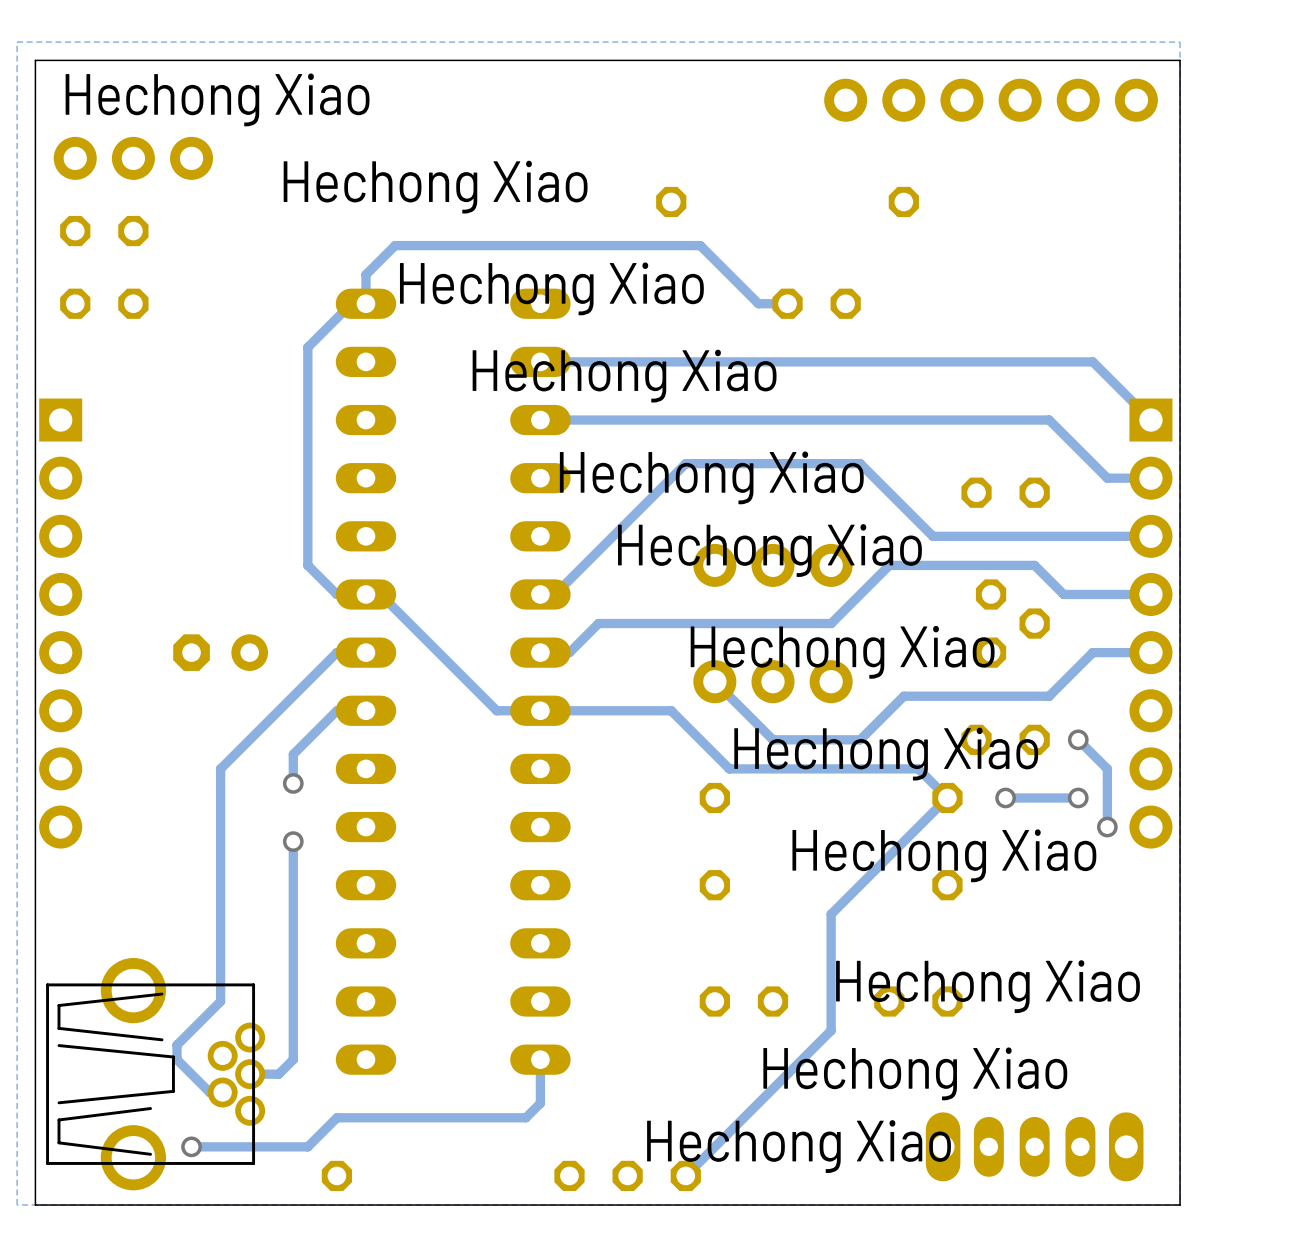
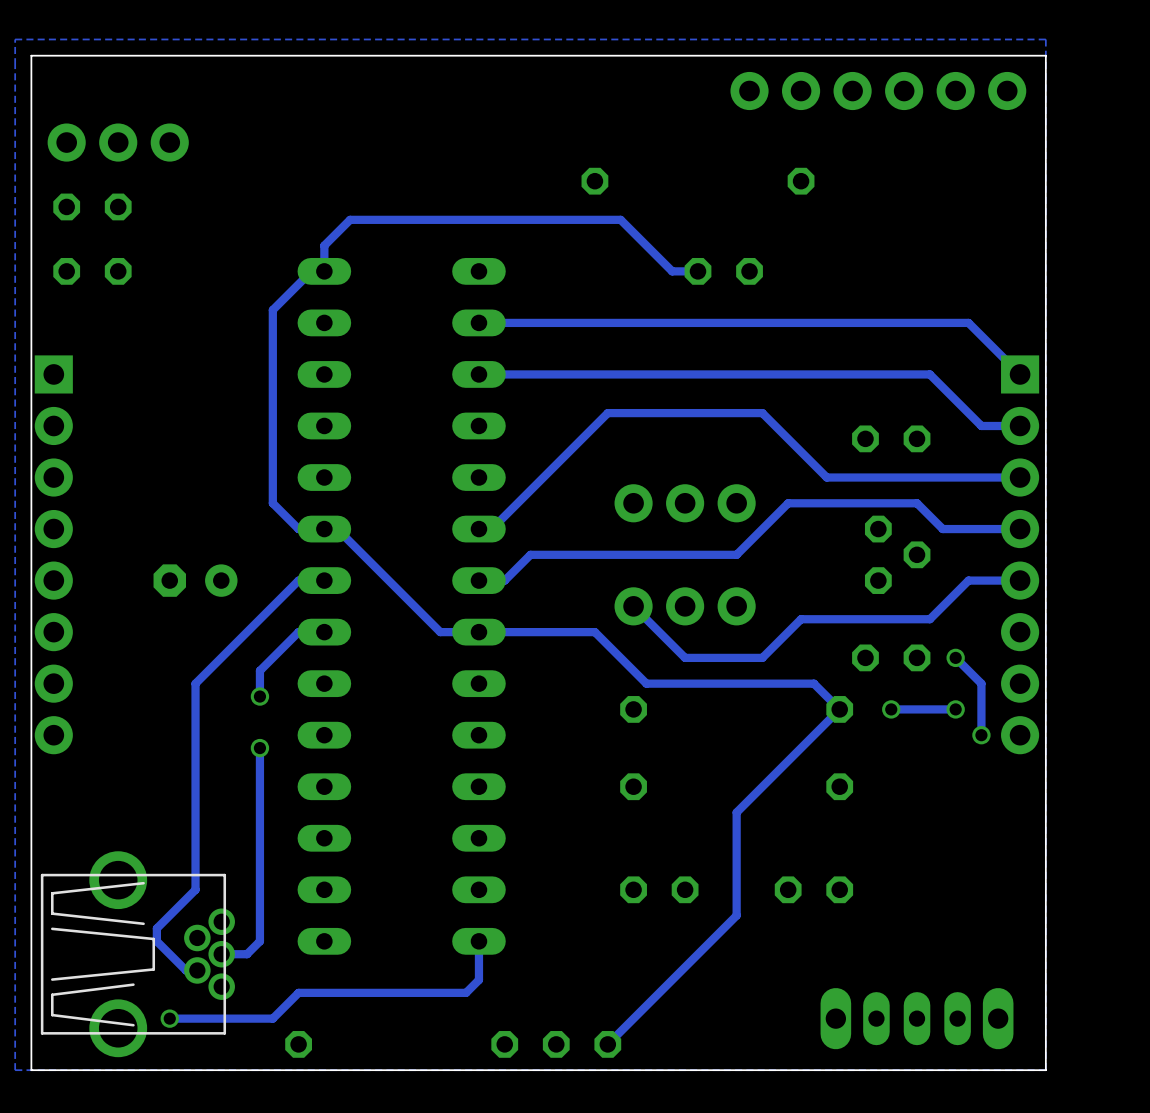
text: Hechong Xiao (217, 99) -> none
text: Hechong Xiao (435, 187) -> none
text: Hechong Xiao (551, 288) -> none
text: Hechong Xiao (624, 376) -> none
text: Hechong Xiao (711, 477) -> none
text: Hechong Xiao (769, 550) -> none
text: Hechong Xiao (842, 652) -> none
text: Hechong Xiao (886, 754) -> none
text: Hechong Xiao (944, 855) -> none
text: Hechong Xiao (988, 986) -> none
text: Hechong Xiao (915, 1073) -> none
text: Hechong Xiao (799, 1146) -> none

